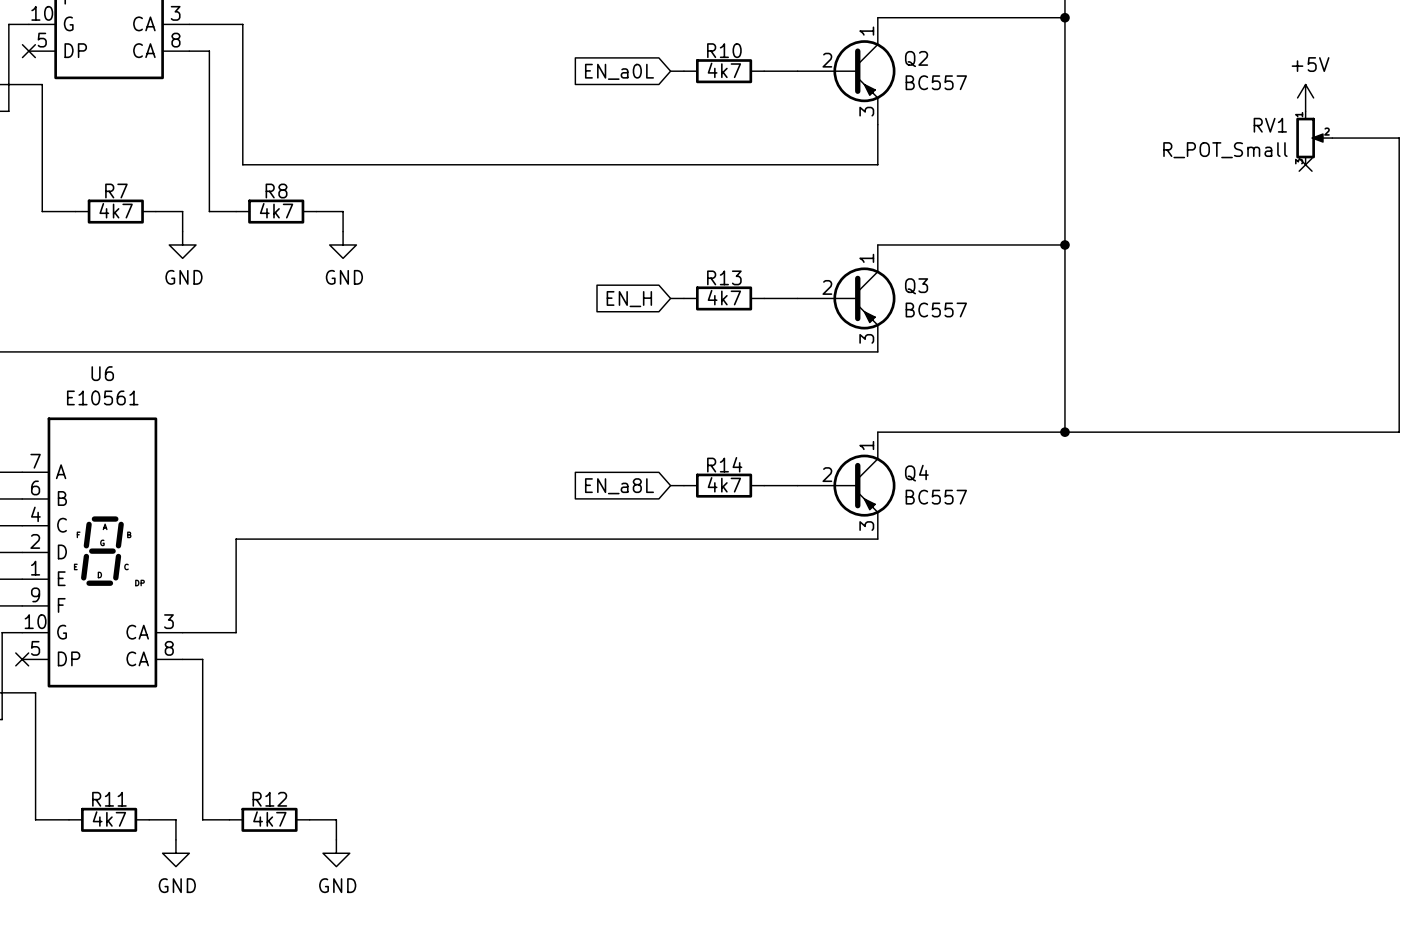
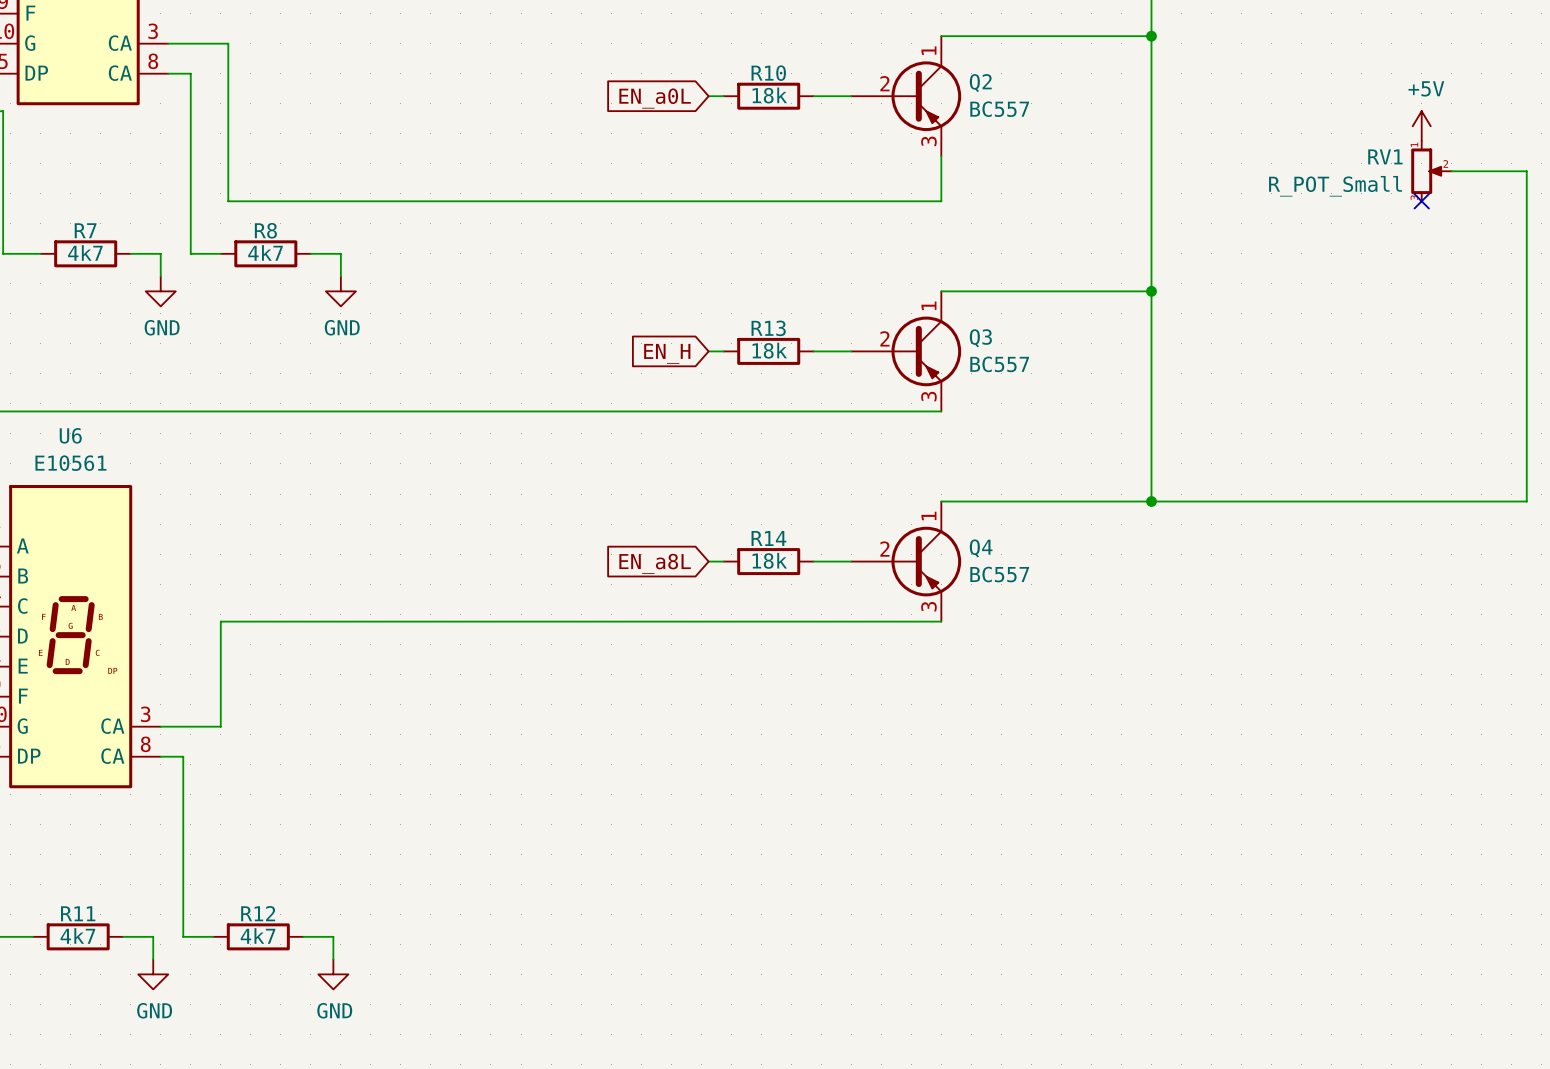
R10 value: 4k7 (724, 70) -> 18k (769, 95)
R13 value: 4k7 (724, 297) -> 18k (769, 350)
R14 value: 4k7 (724, 484) -> 18k (769, 560)

